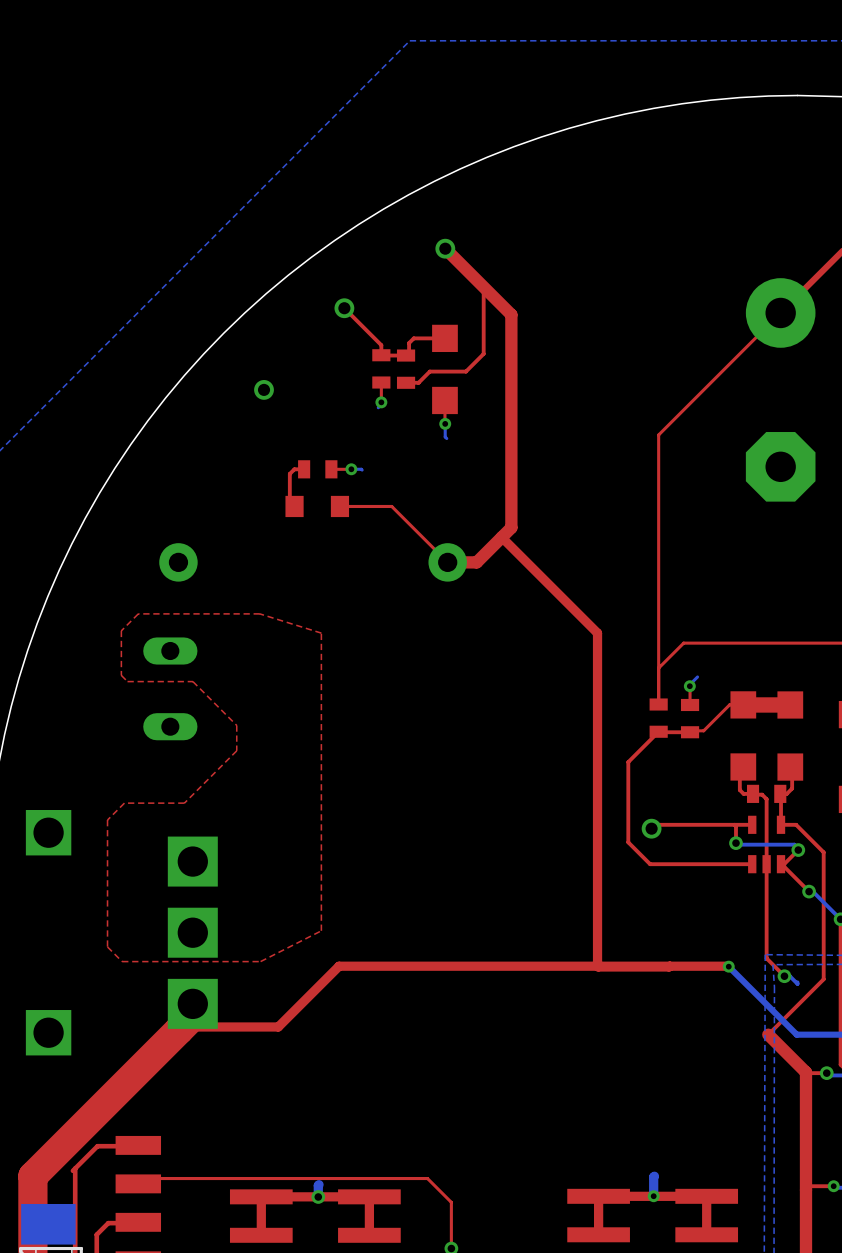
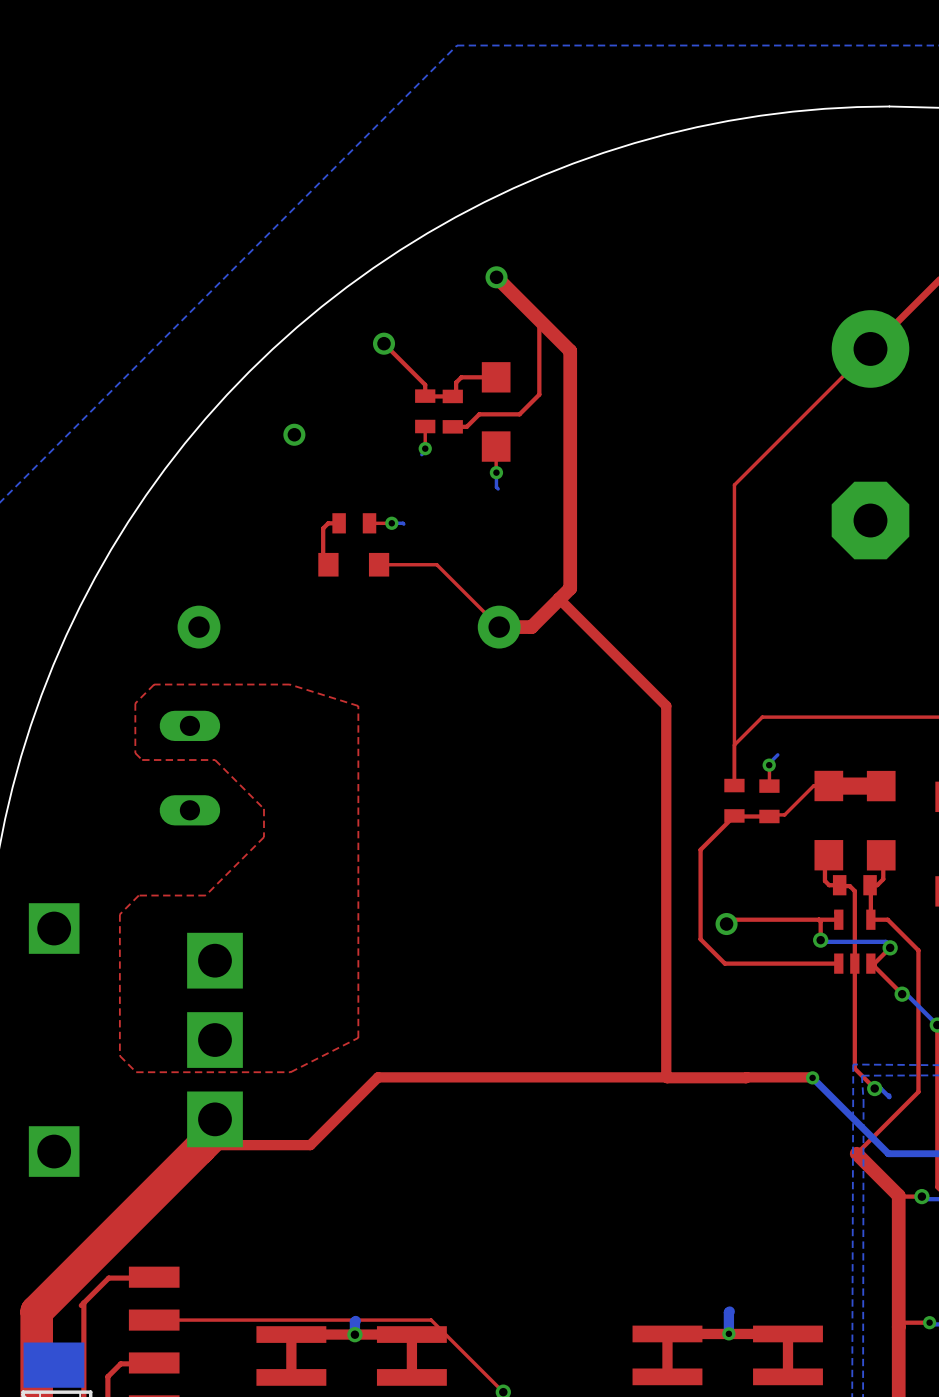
top track: (138, 1183) (143, 1178) (427, 1178) (451, 1202) (451, 1248) -> (154, 1320) (431, 1320) (503, 1392)

